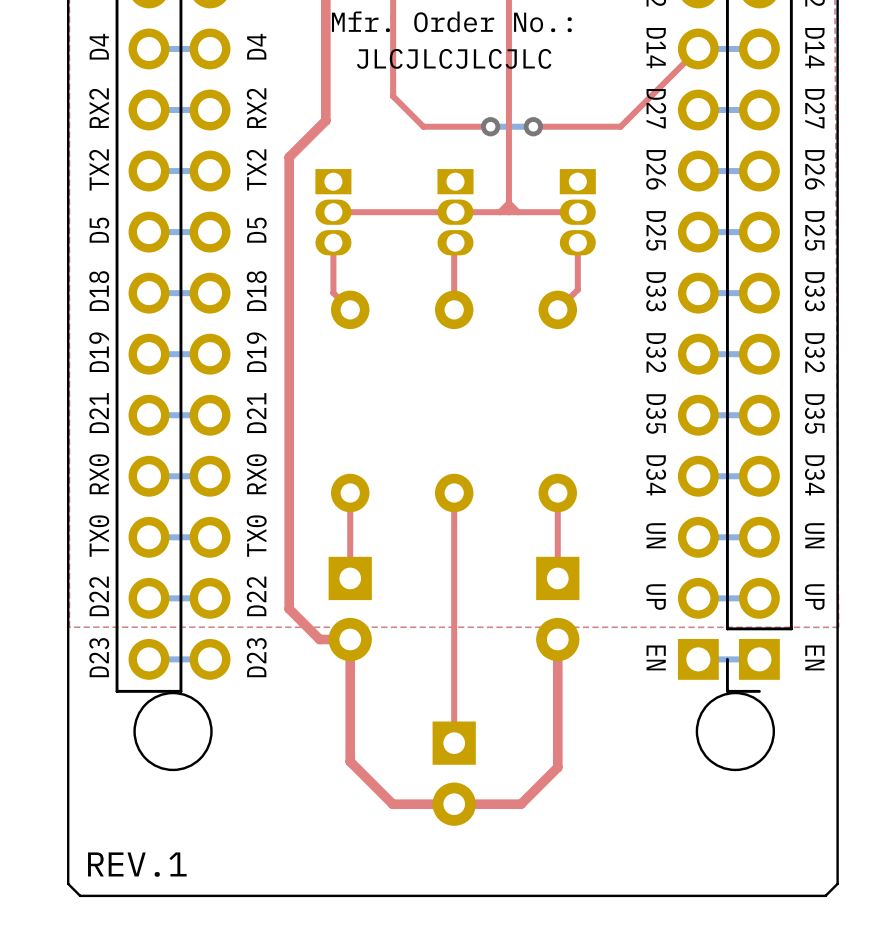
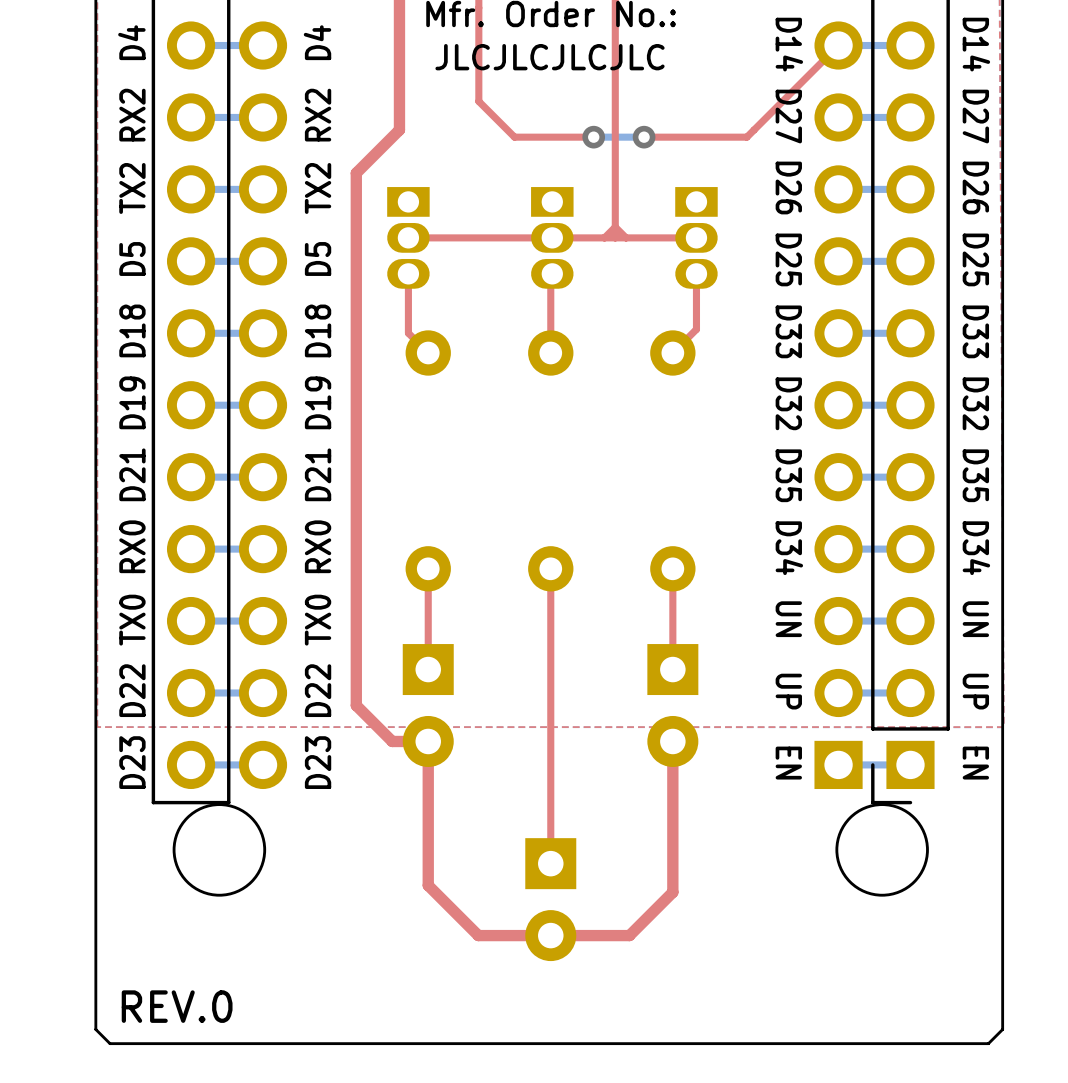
text: REV.1 (137, 864) -> REV.0 (177, 1006)

